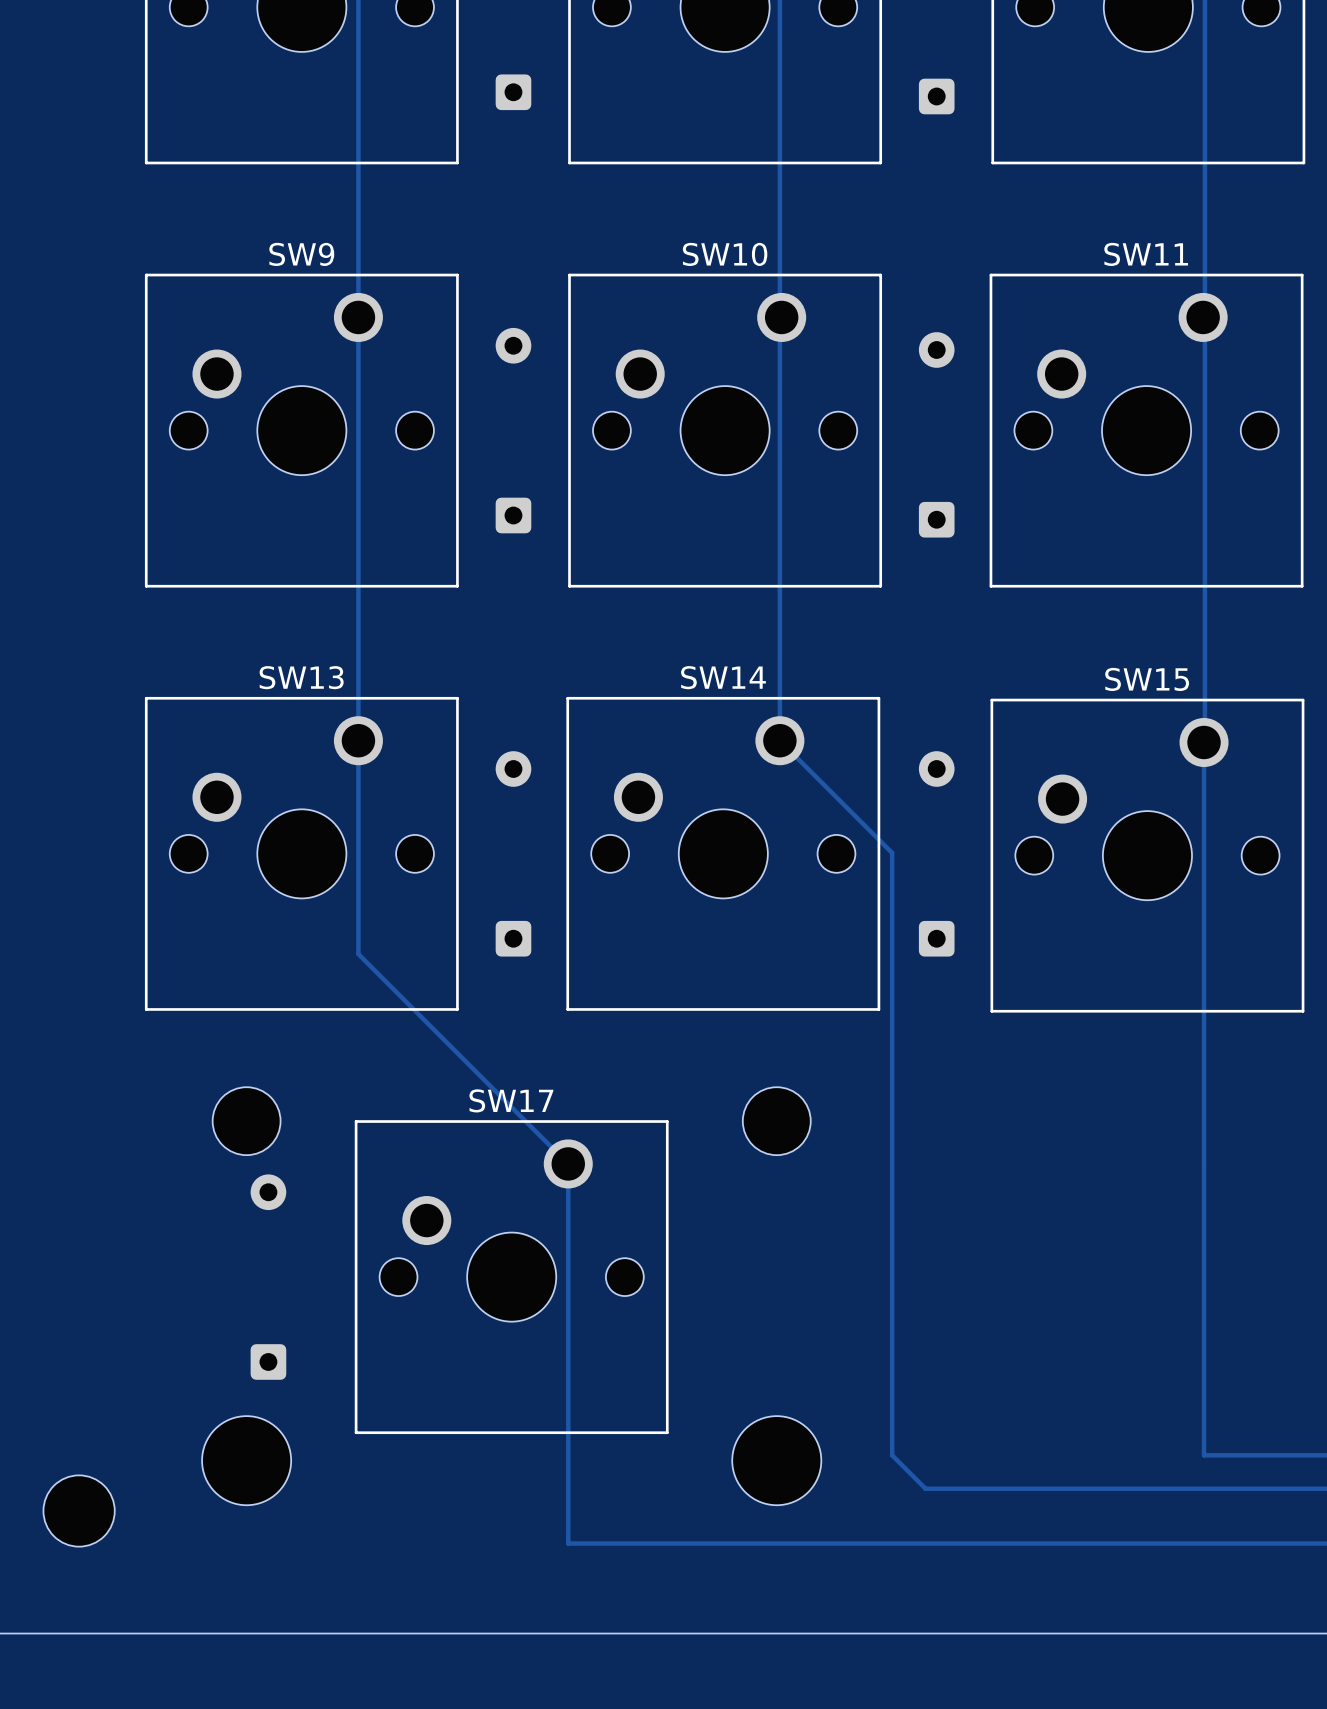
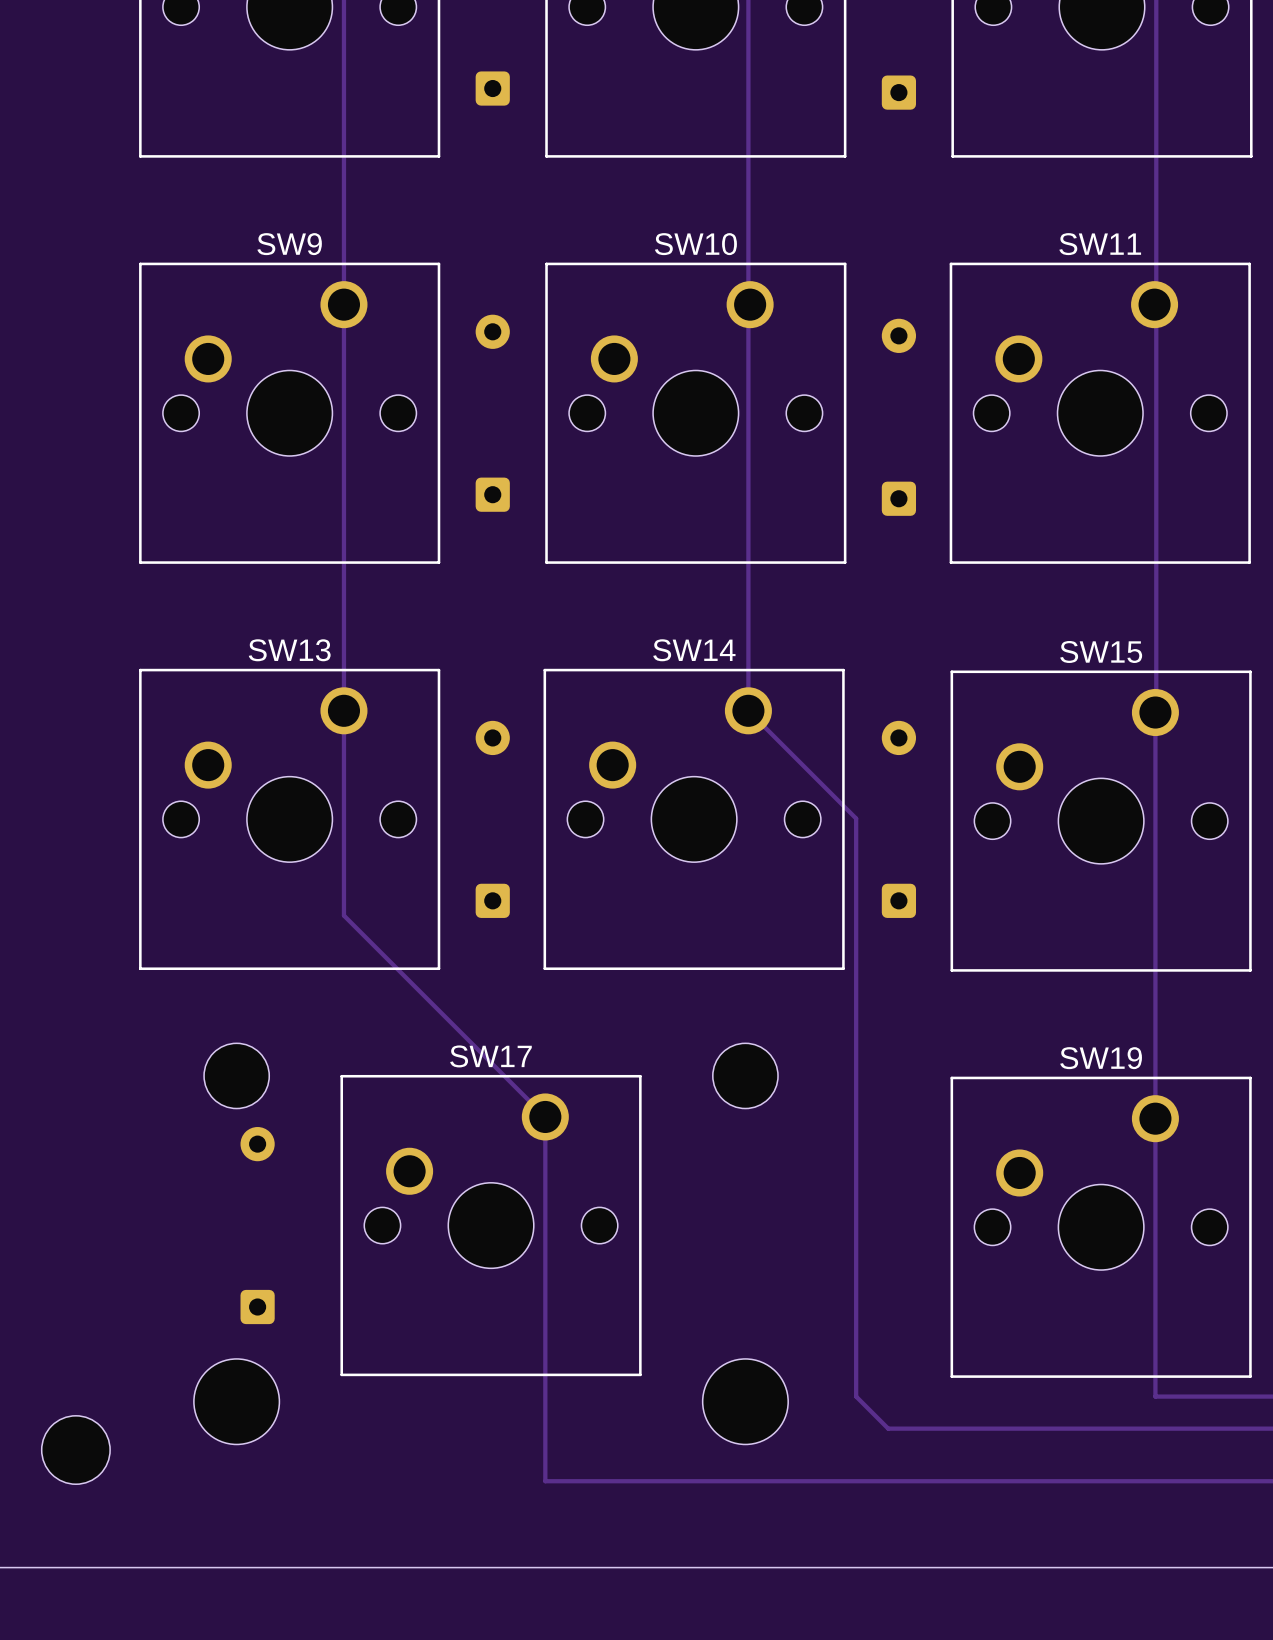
SW19: none -> (1101, 1227)

